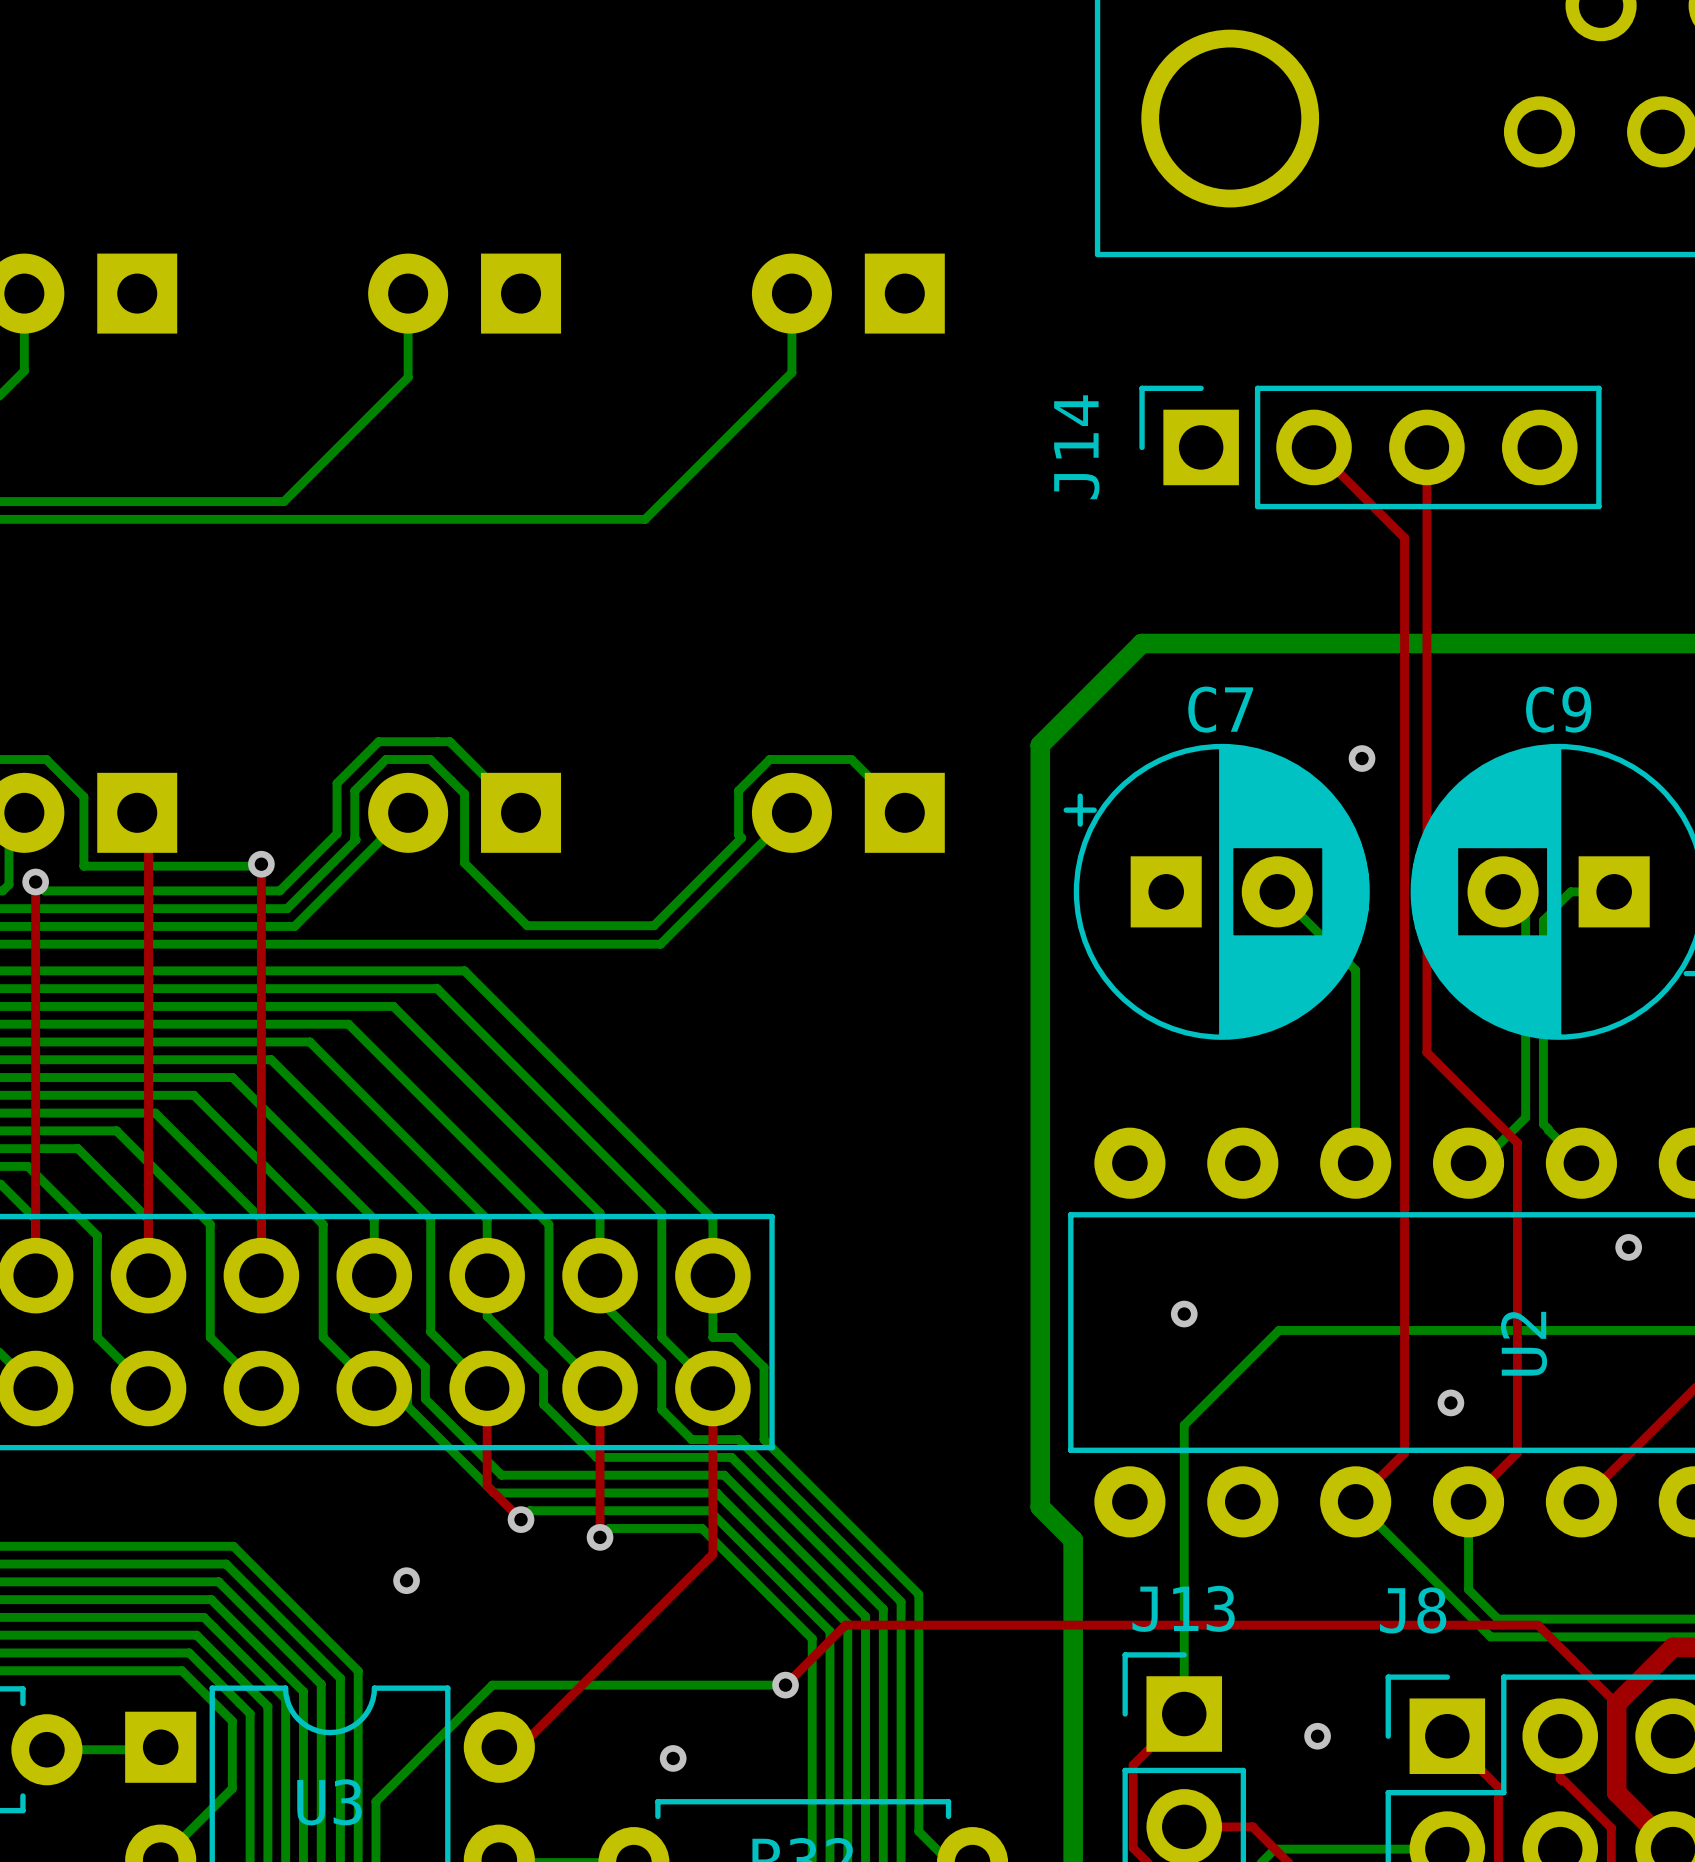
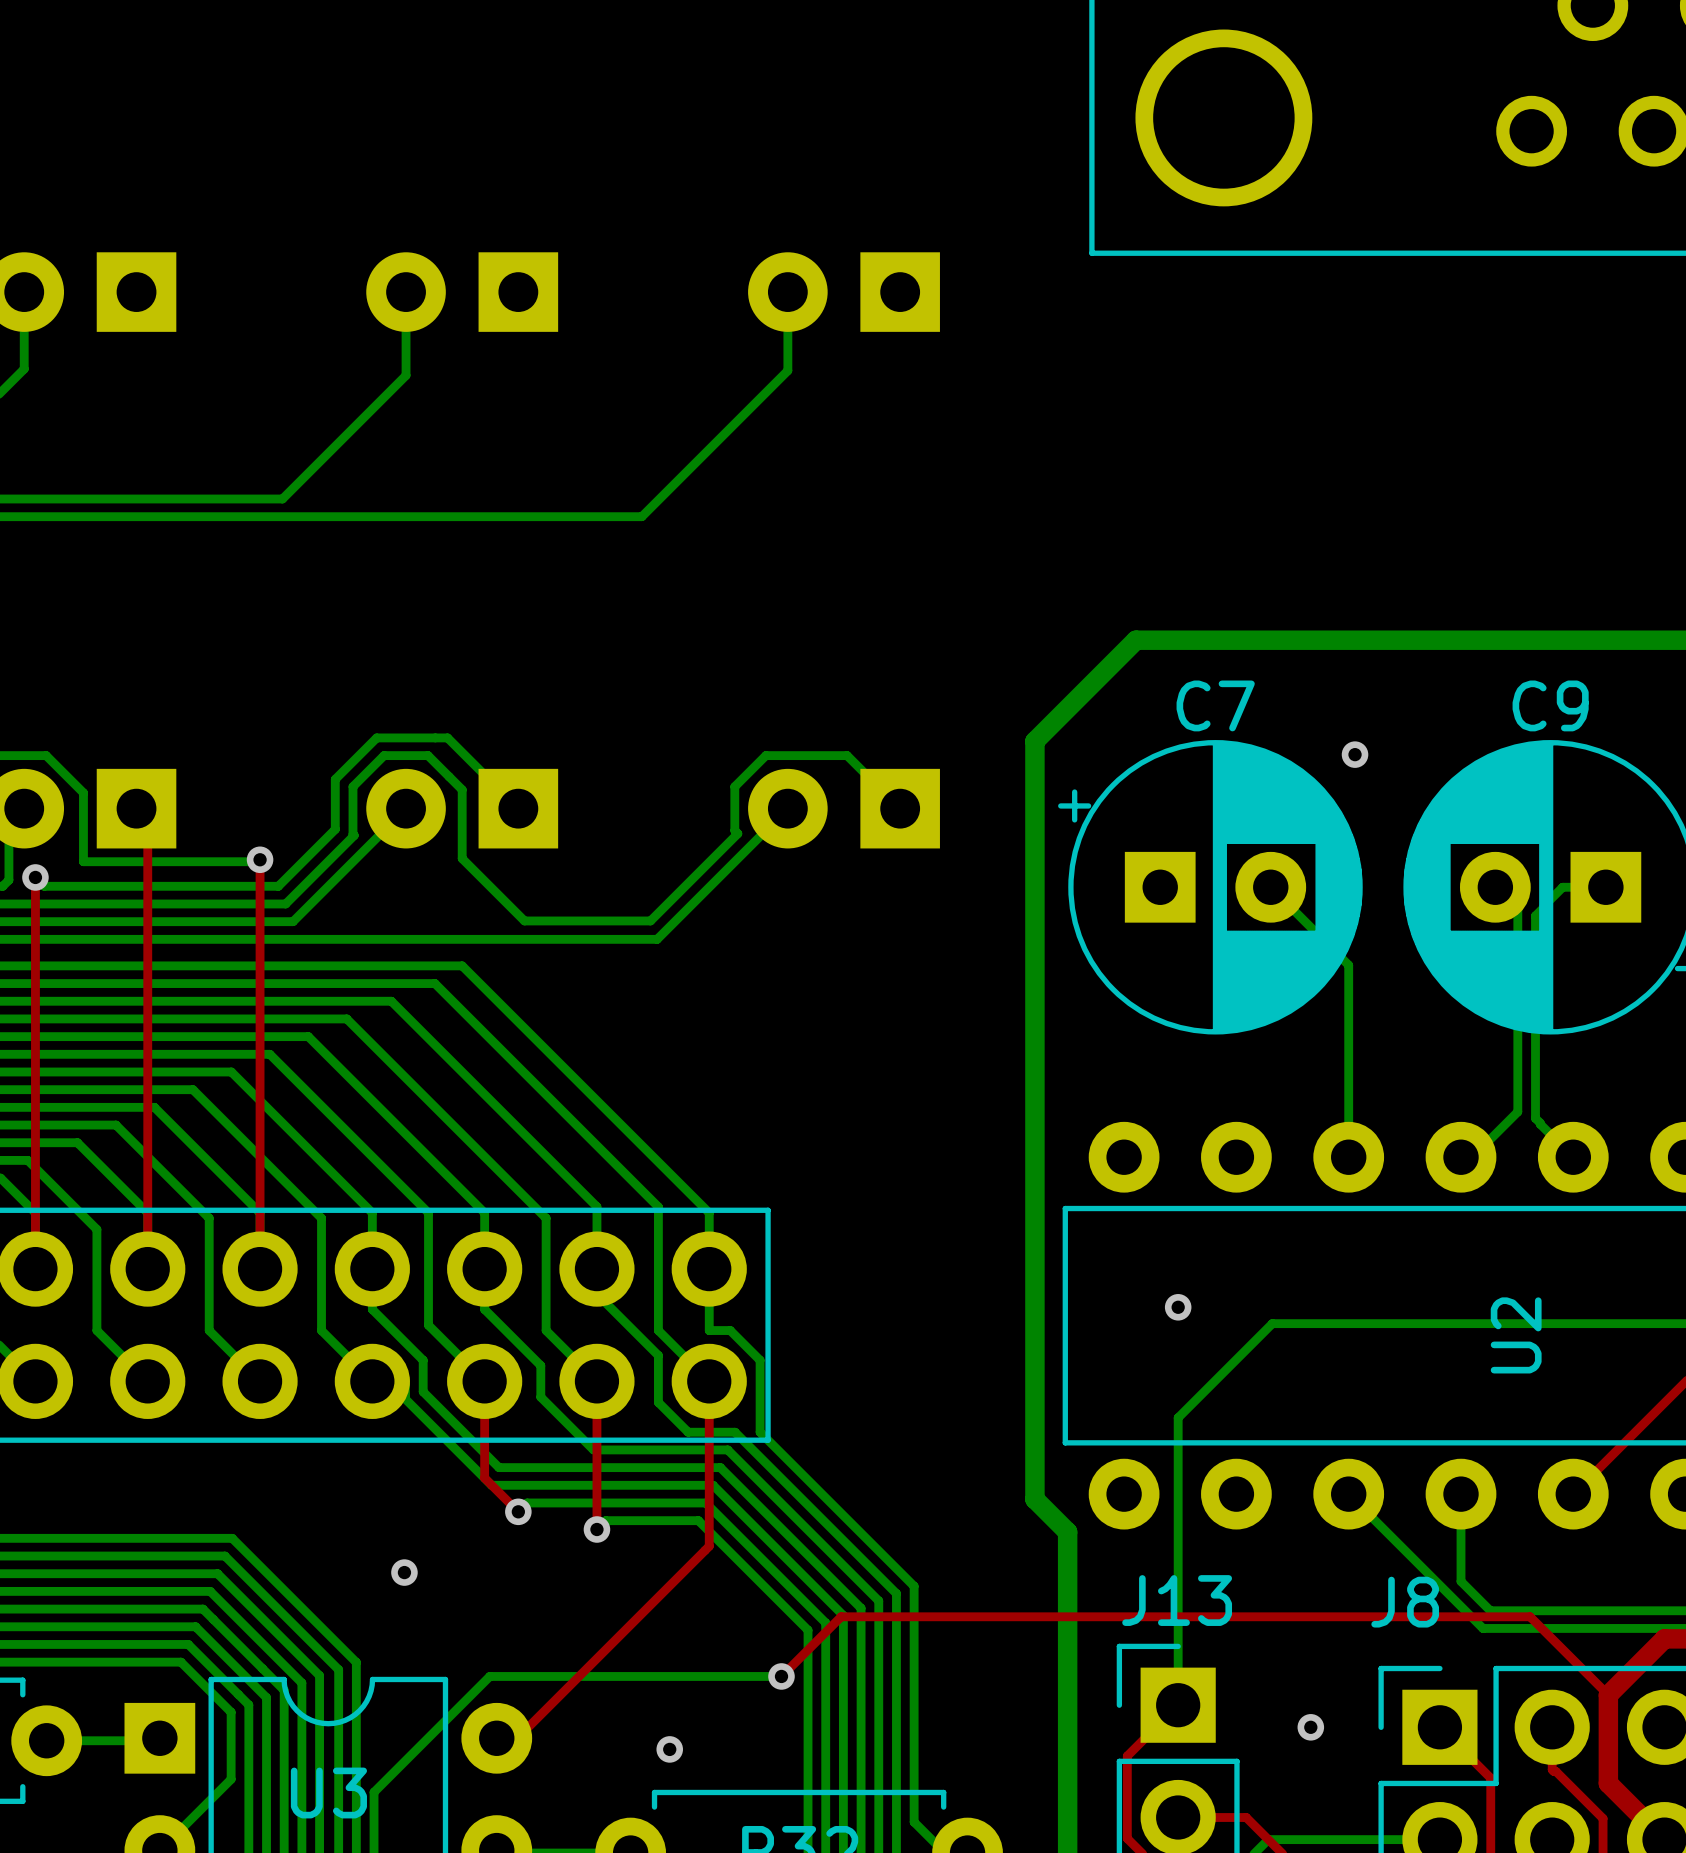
top track: (1314, 447) (1404, 537) (1404, 1452) (1355, 1501) -> none
J14: (1370, 447) -> none
top track: (1426, 447) (1426, 1052) (1517, 1142) (1517, 1452) (1468, 1501) -> none
via: (1628, 1247) -> none
via: (1450, 1402) -> none

